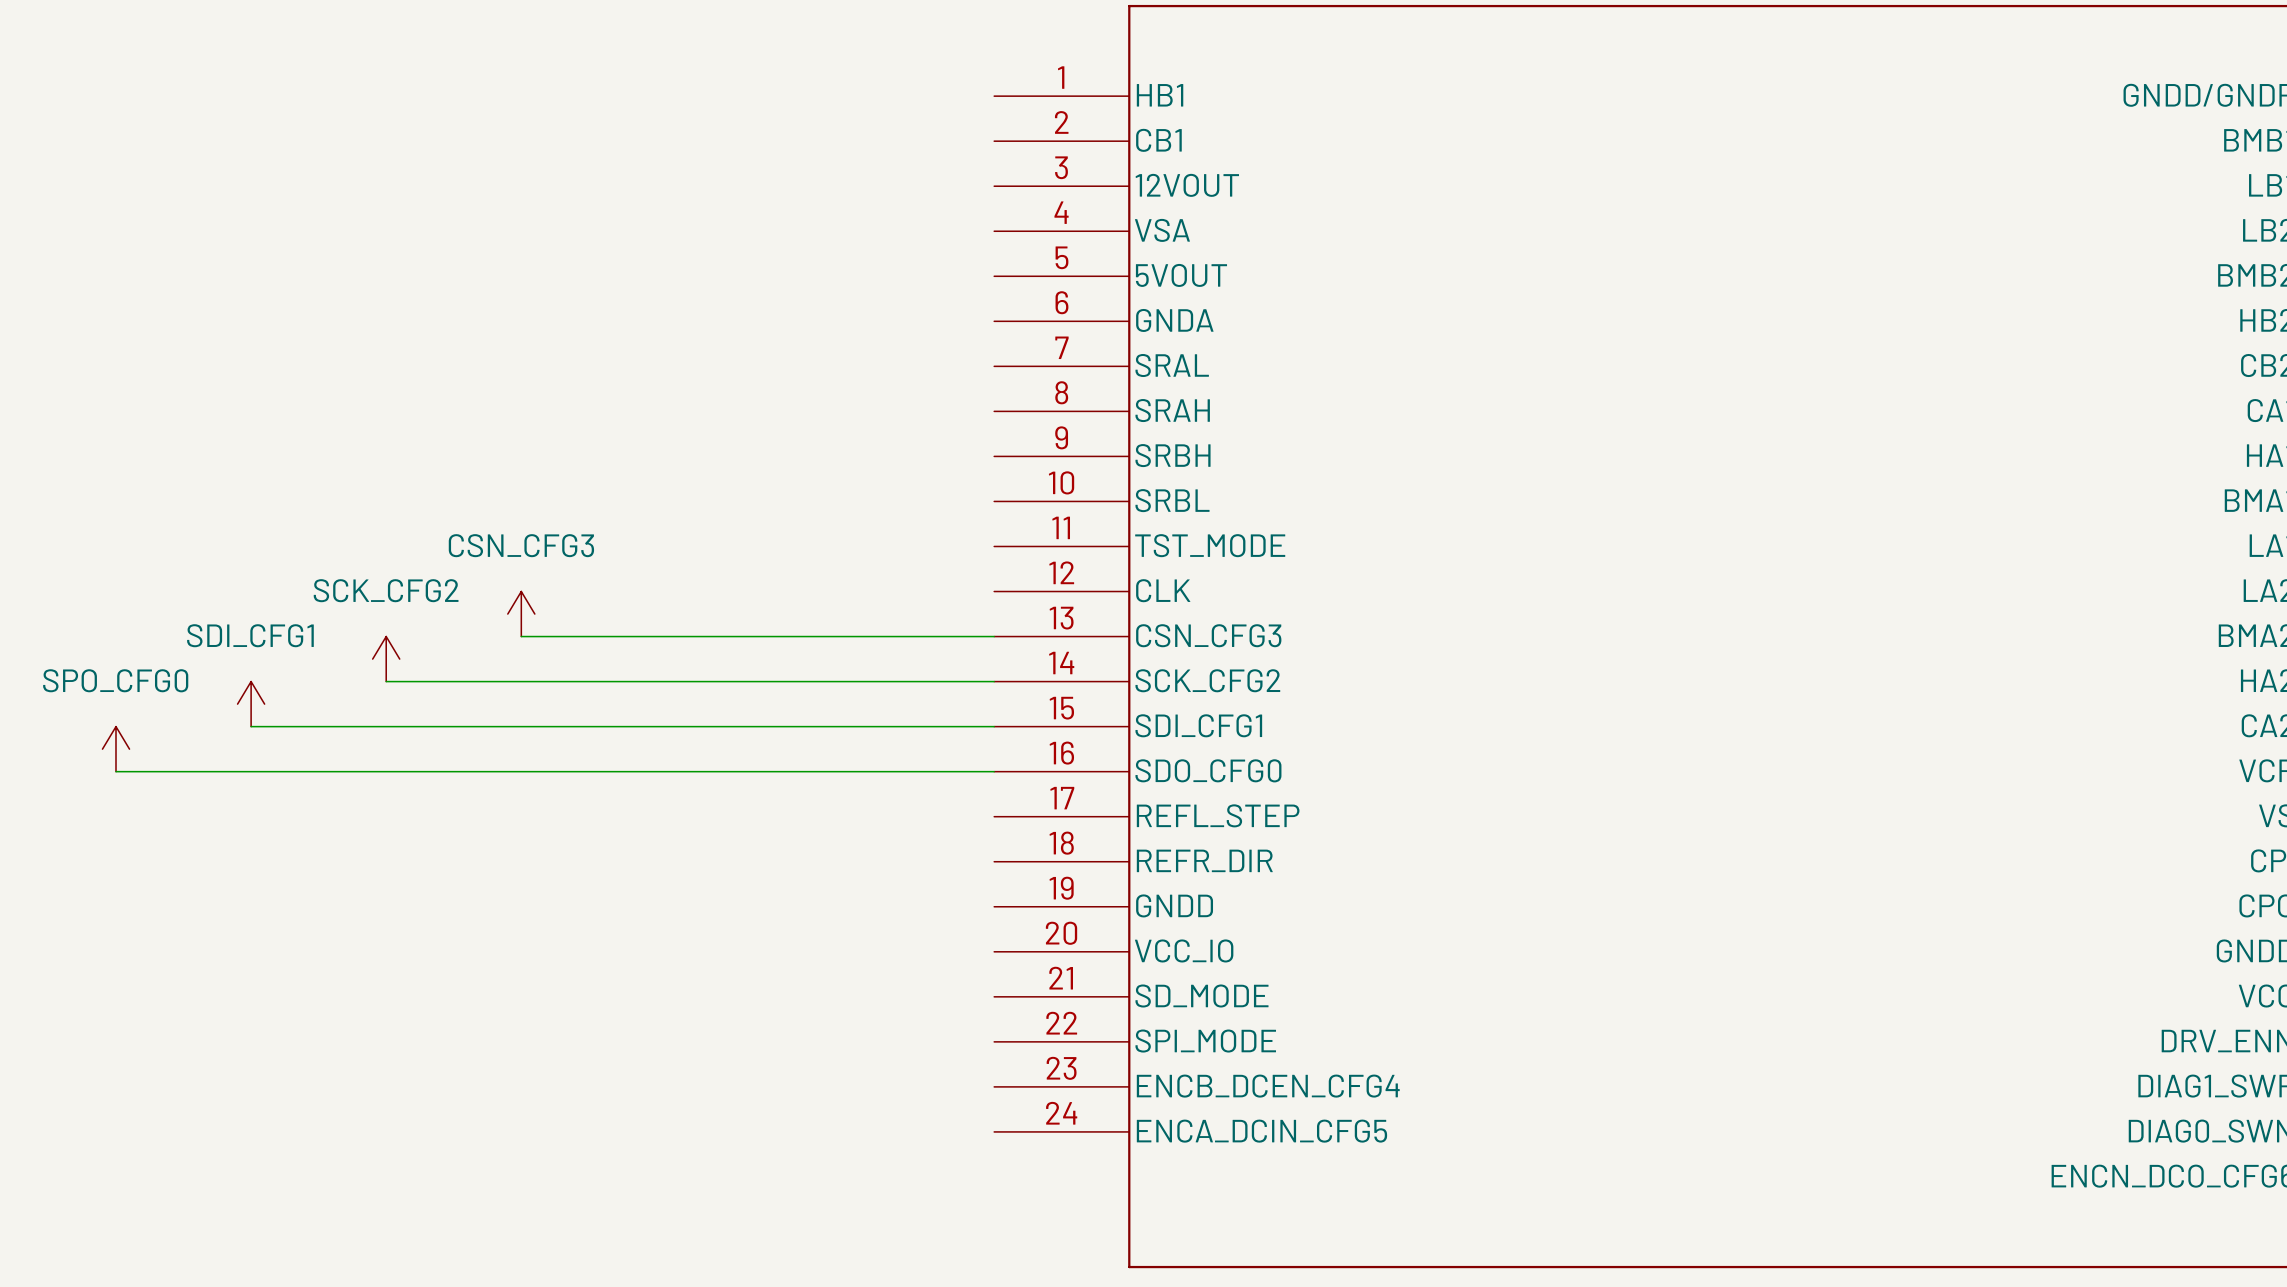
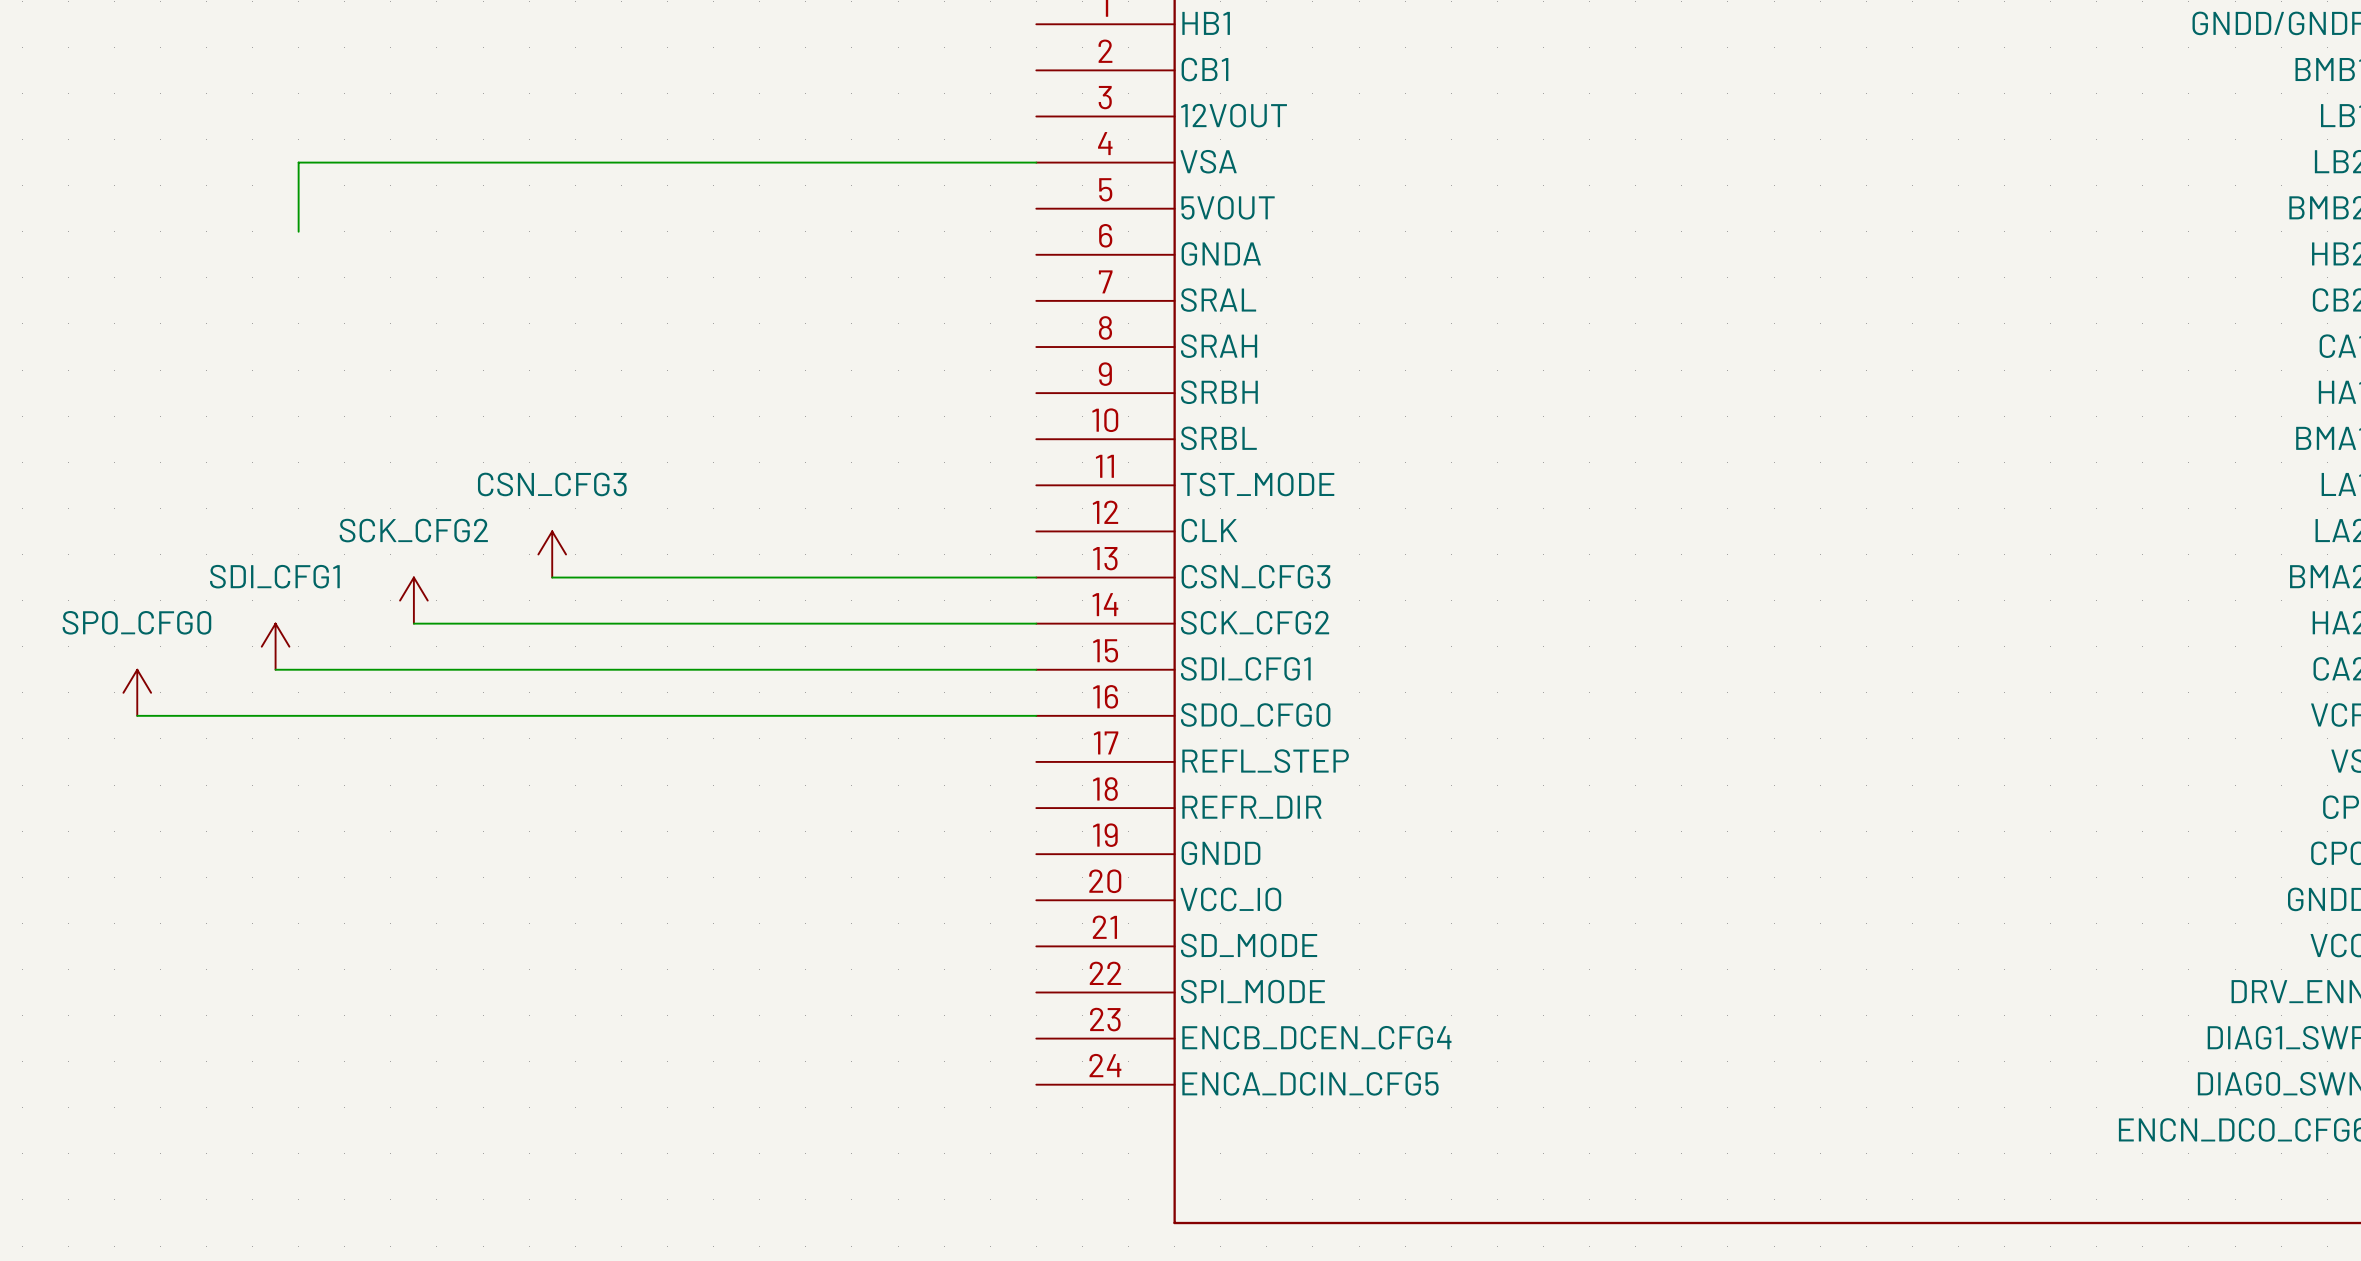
wire: none -> (1036, 162) (298, 162) (298, 231)

